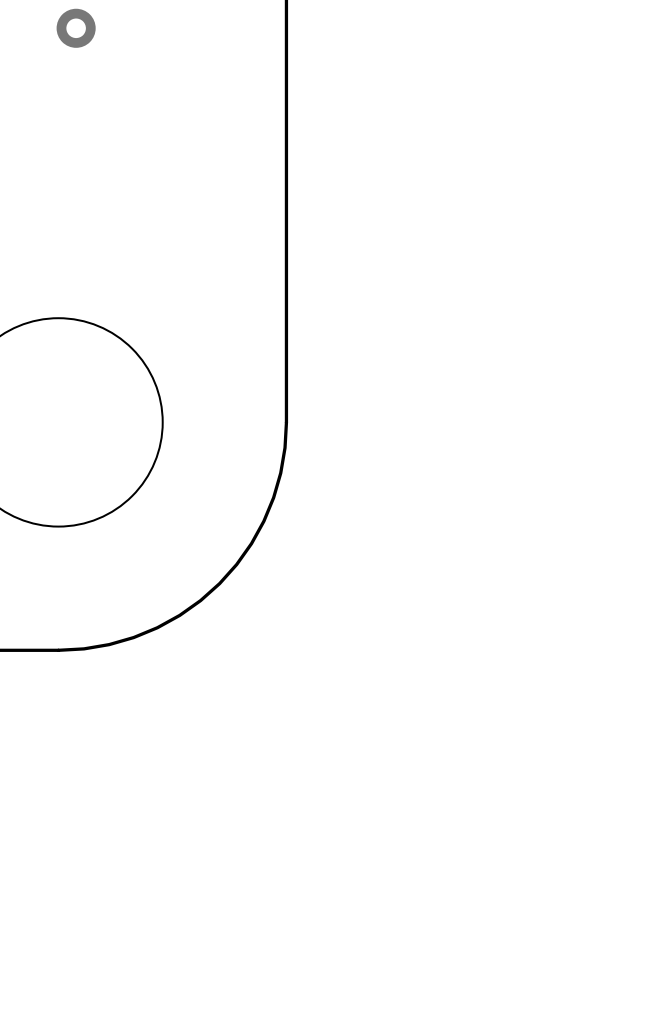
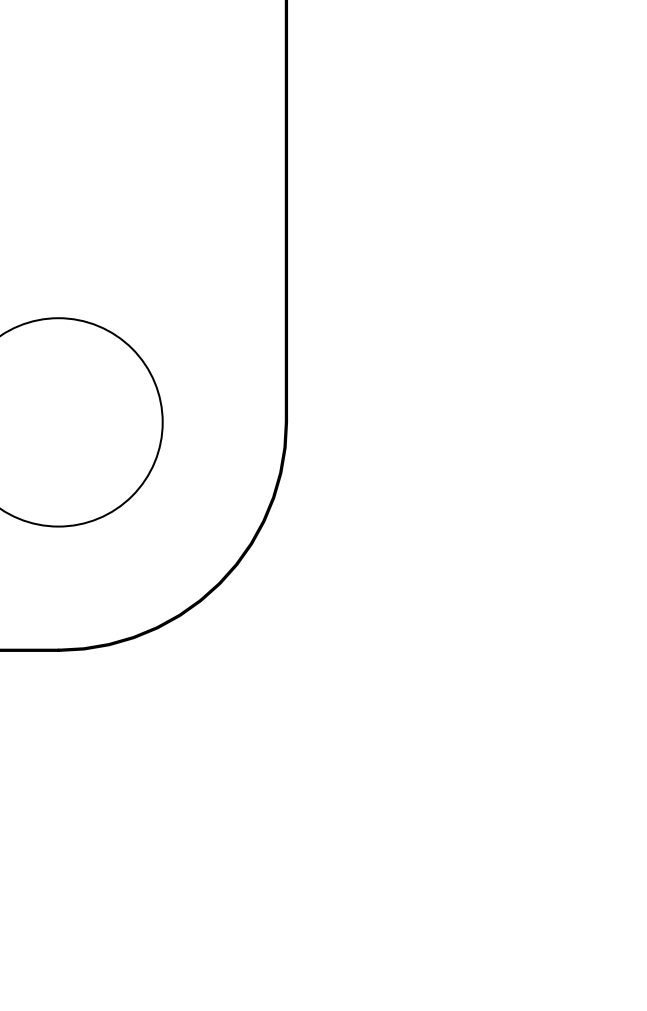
via: (76, 28) -> none

